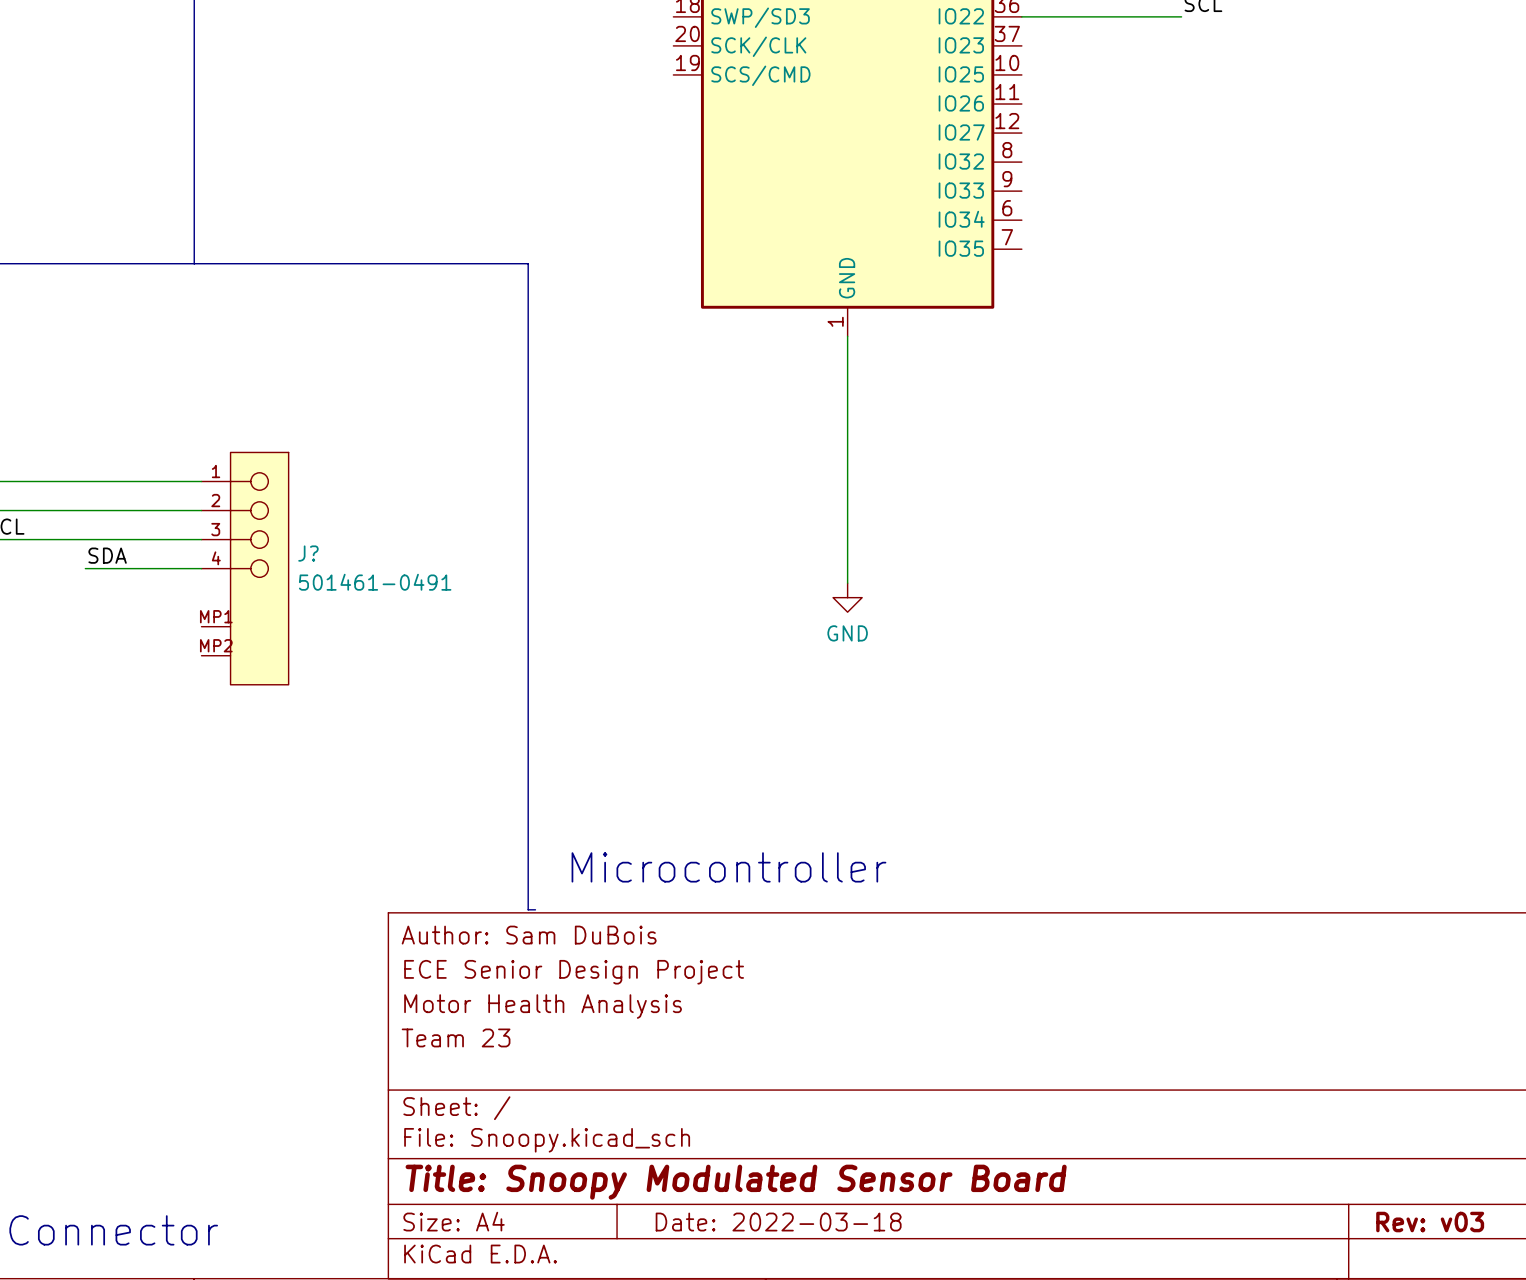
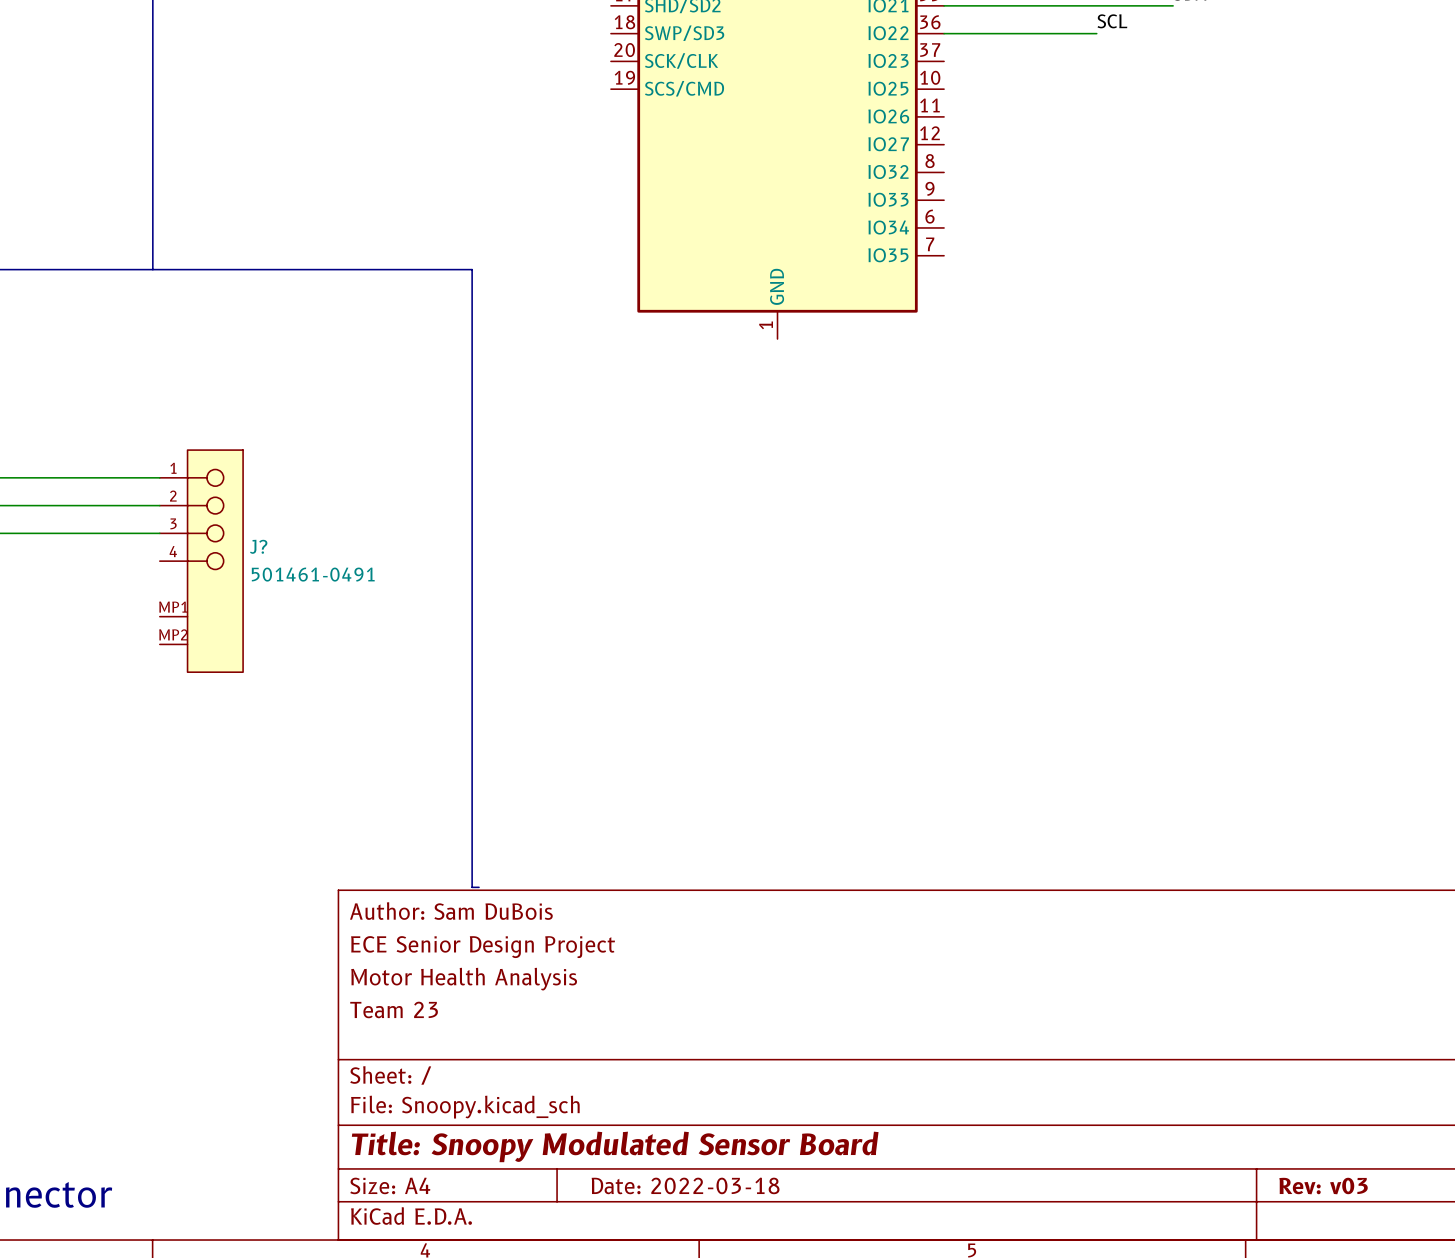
wire: (847, 336) (847, 583) -> none
label: SDA (107, 555) -> none
wire: (85, 568) (201, 568) -> none
power symbol: GND (847, 597) -> none
text: Microcontroller (728, 867) -> none

